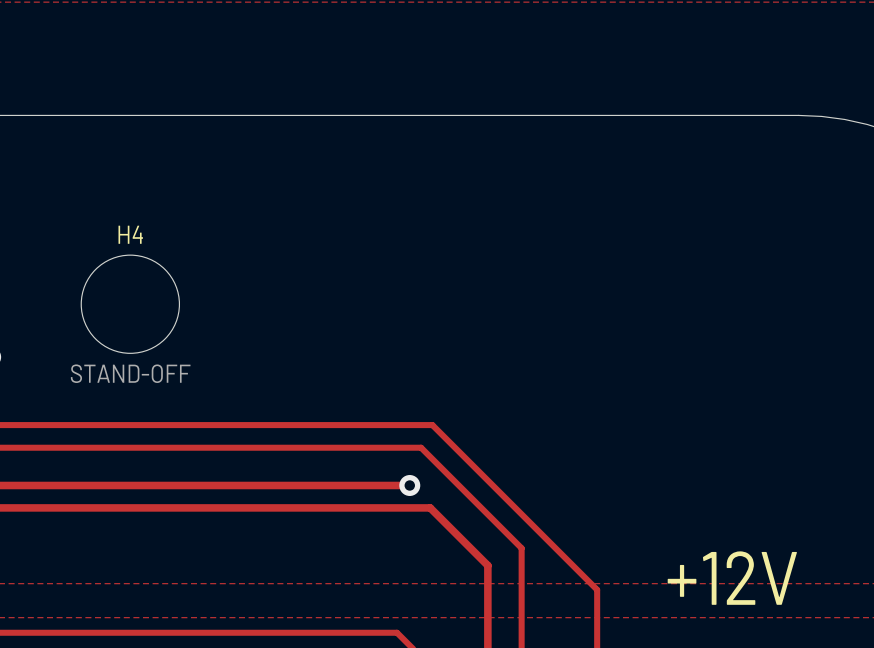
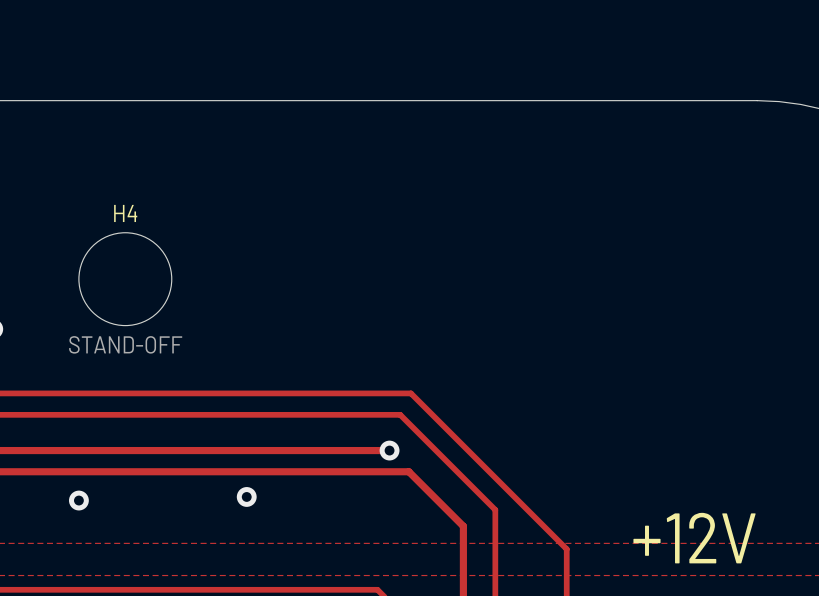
via: none -> (246, 496)
via: none -> (78, 500)

